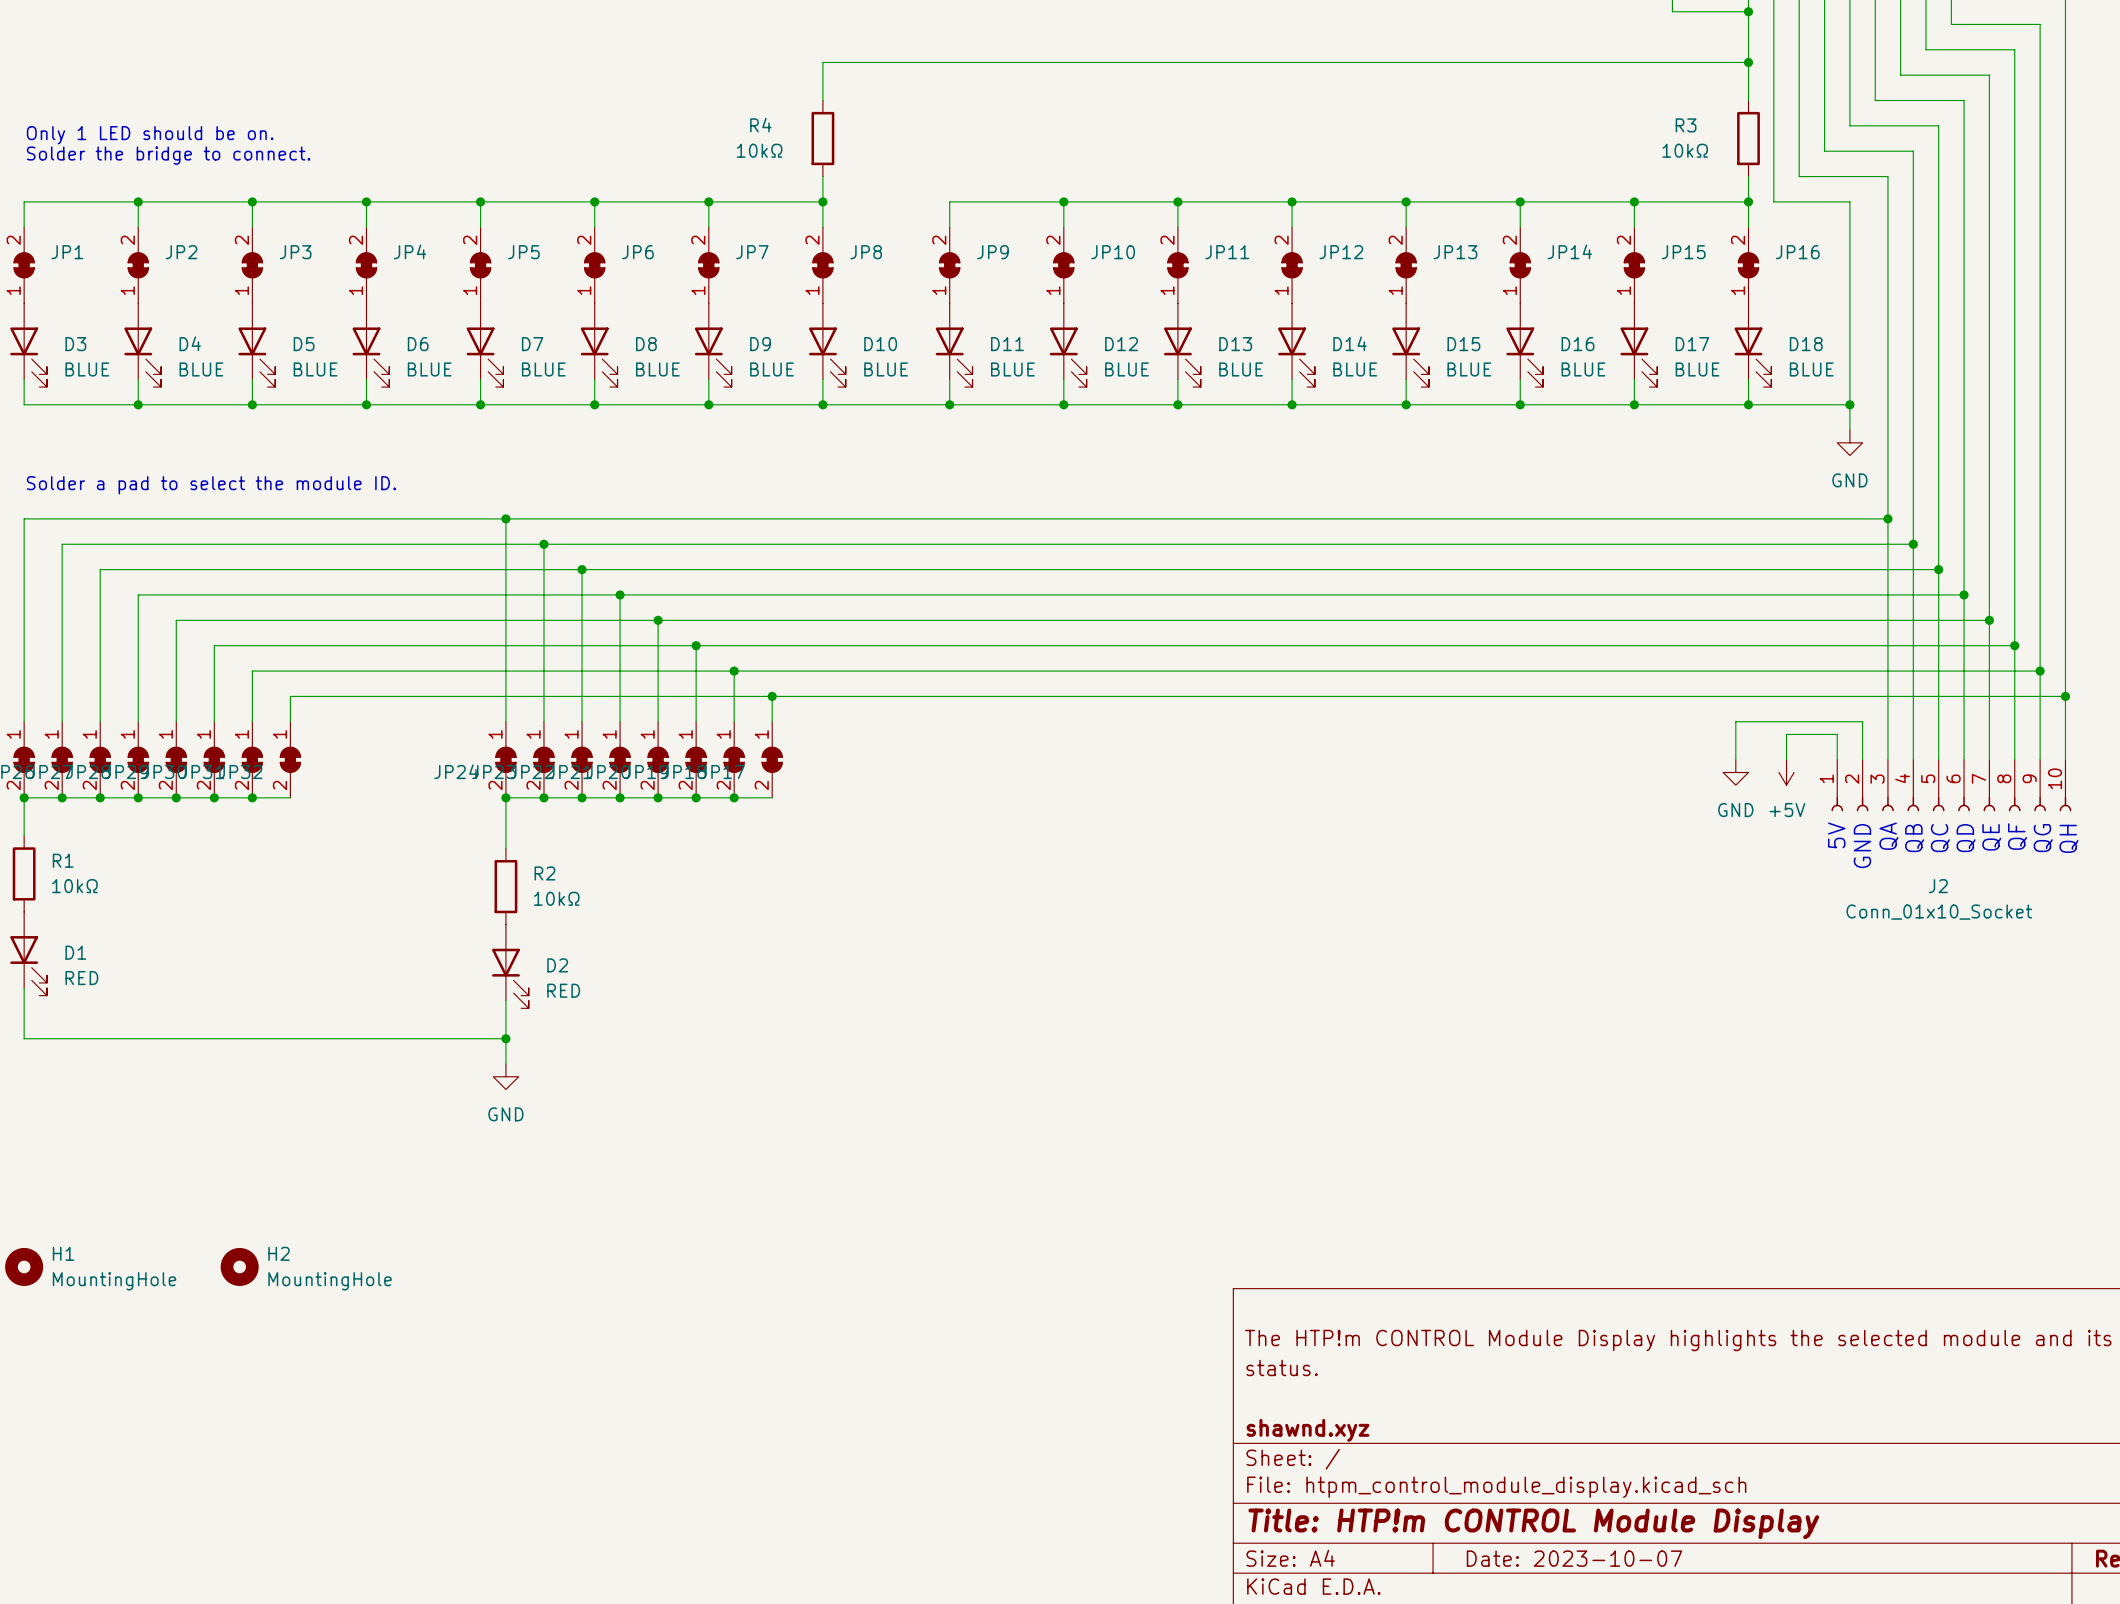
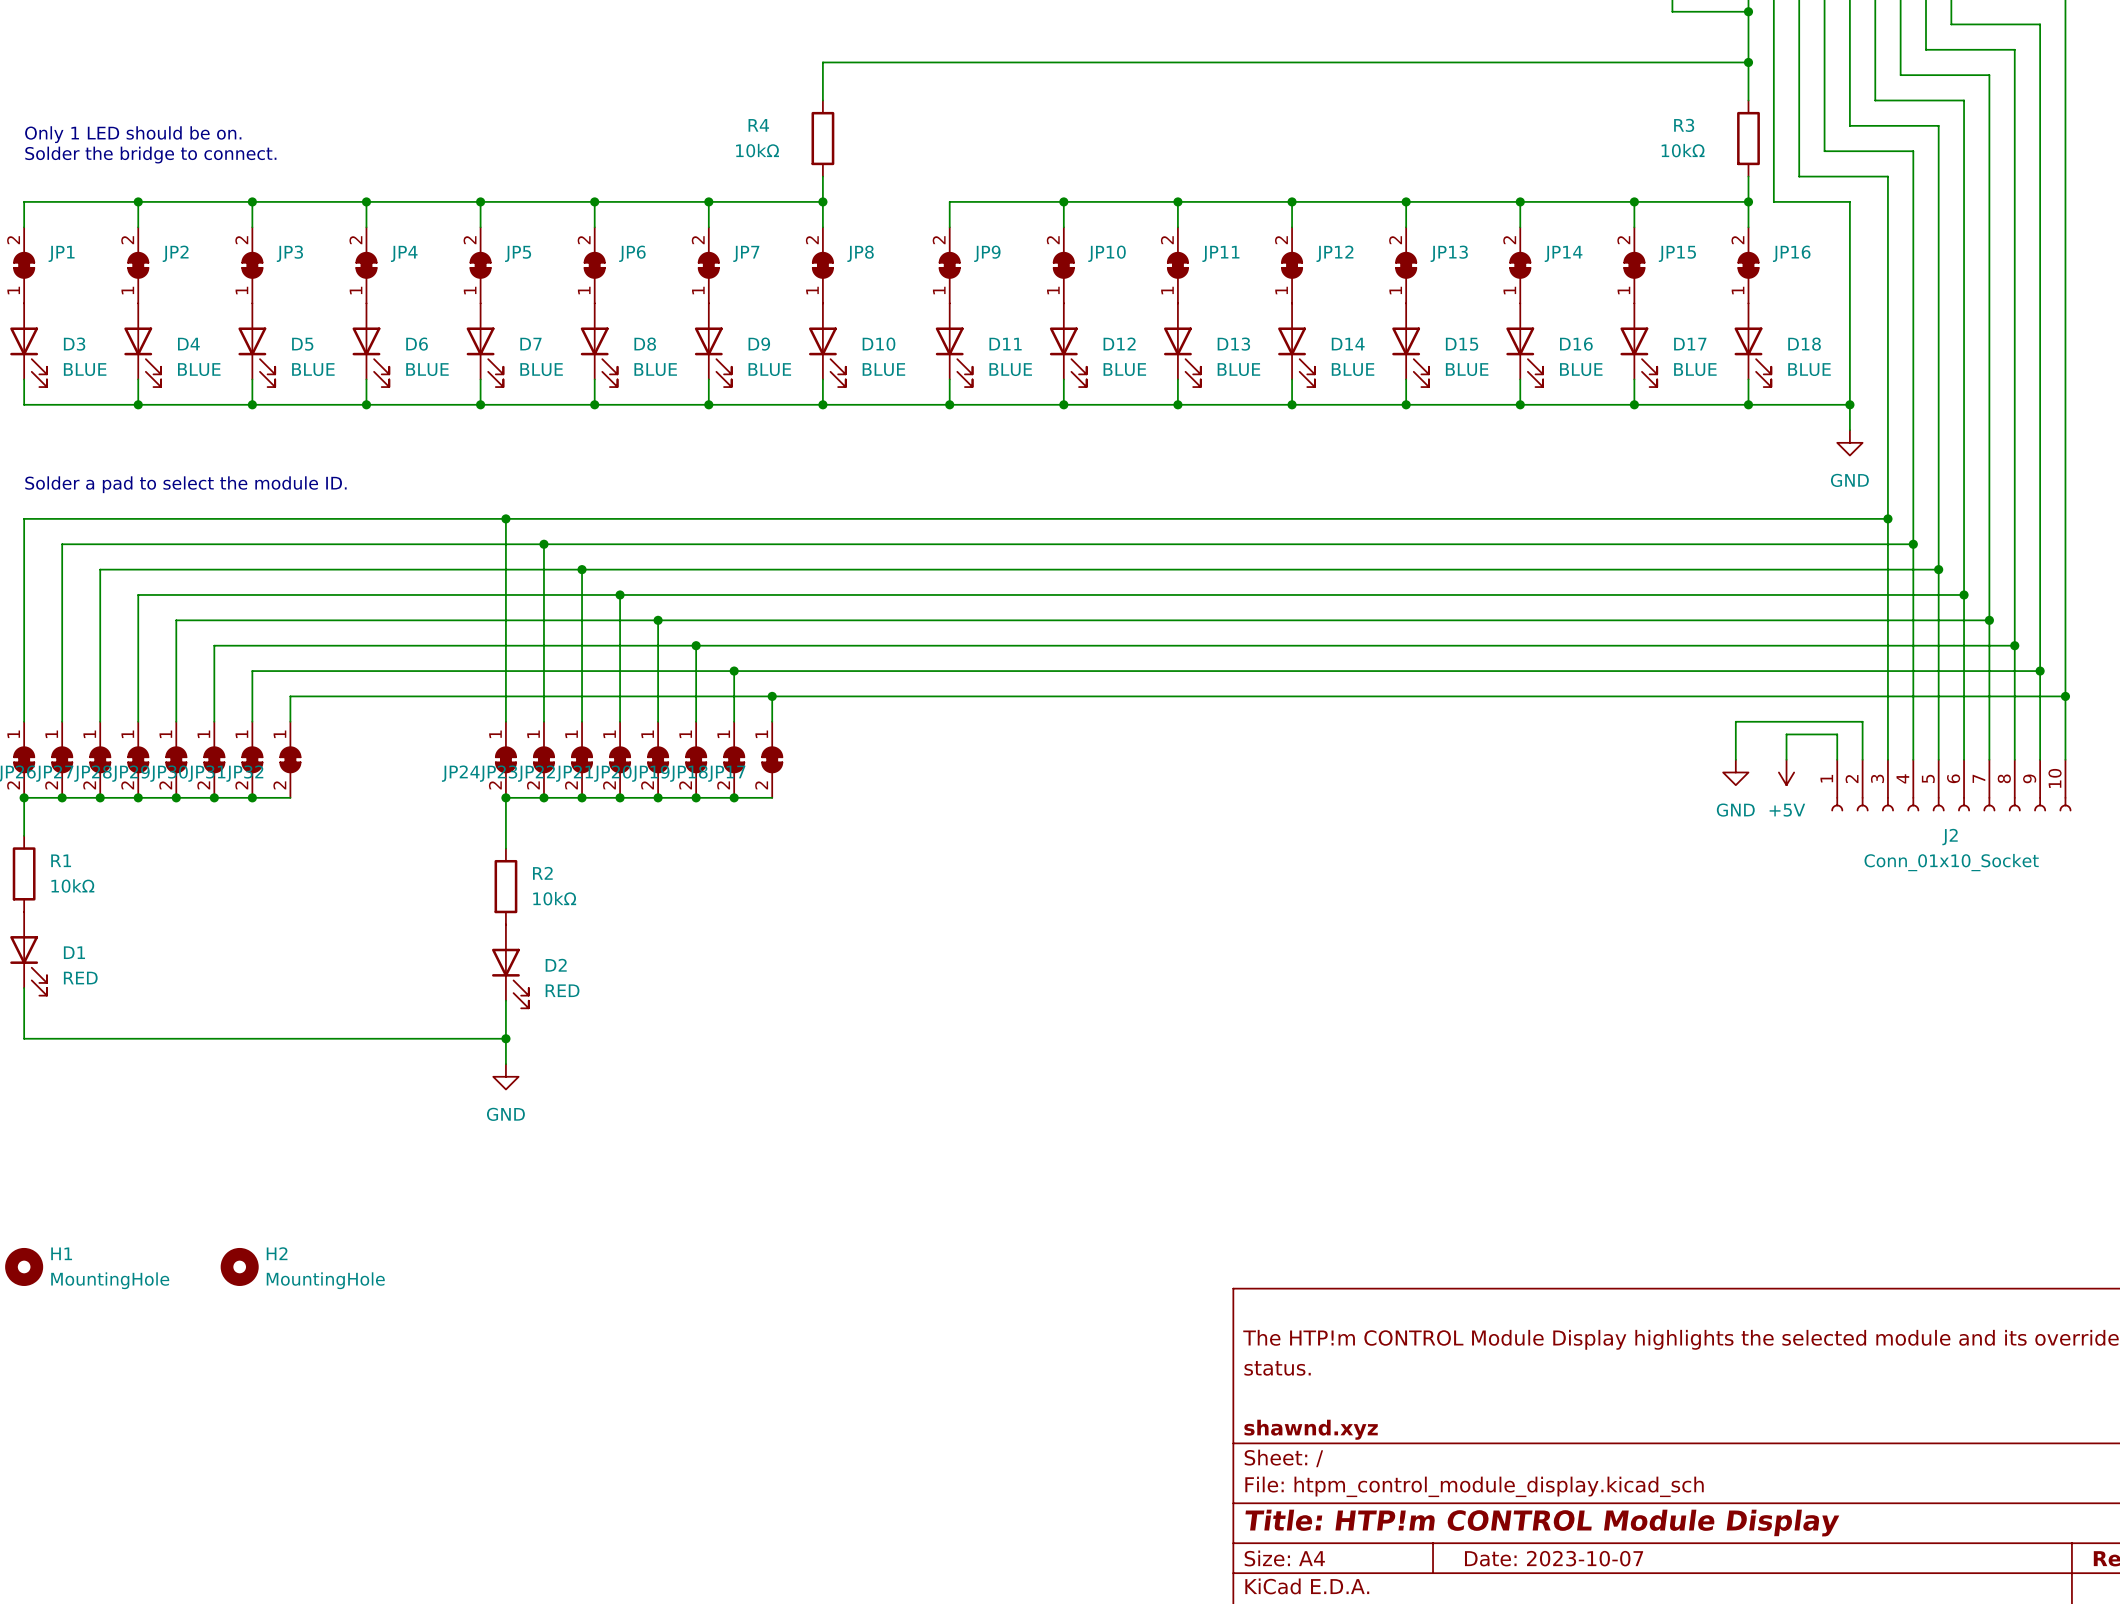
text: 5V (1836, 835) -> none
text: QA (1888, 836) -> none
text: QF (2017, 836) -> none
text: QE (1991, 837) -> none
text: QB (1914, 838) -> none
text: QC (1940, 838) -> none
text: QD (1966, 838) -> none
text: QG (2043, 838) -> none
text: QH (2068, 838) -> none
text: GND (1862, 846) -> none
J2 name position: J2 (1938, 886) -> J2 (1950, 837)
J2 value position: Conn_01x10_Socket (1939, 912) -> Conn_01x10_Socket (1951, 862)

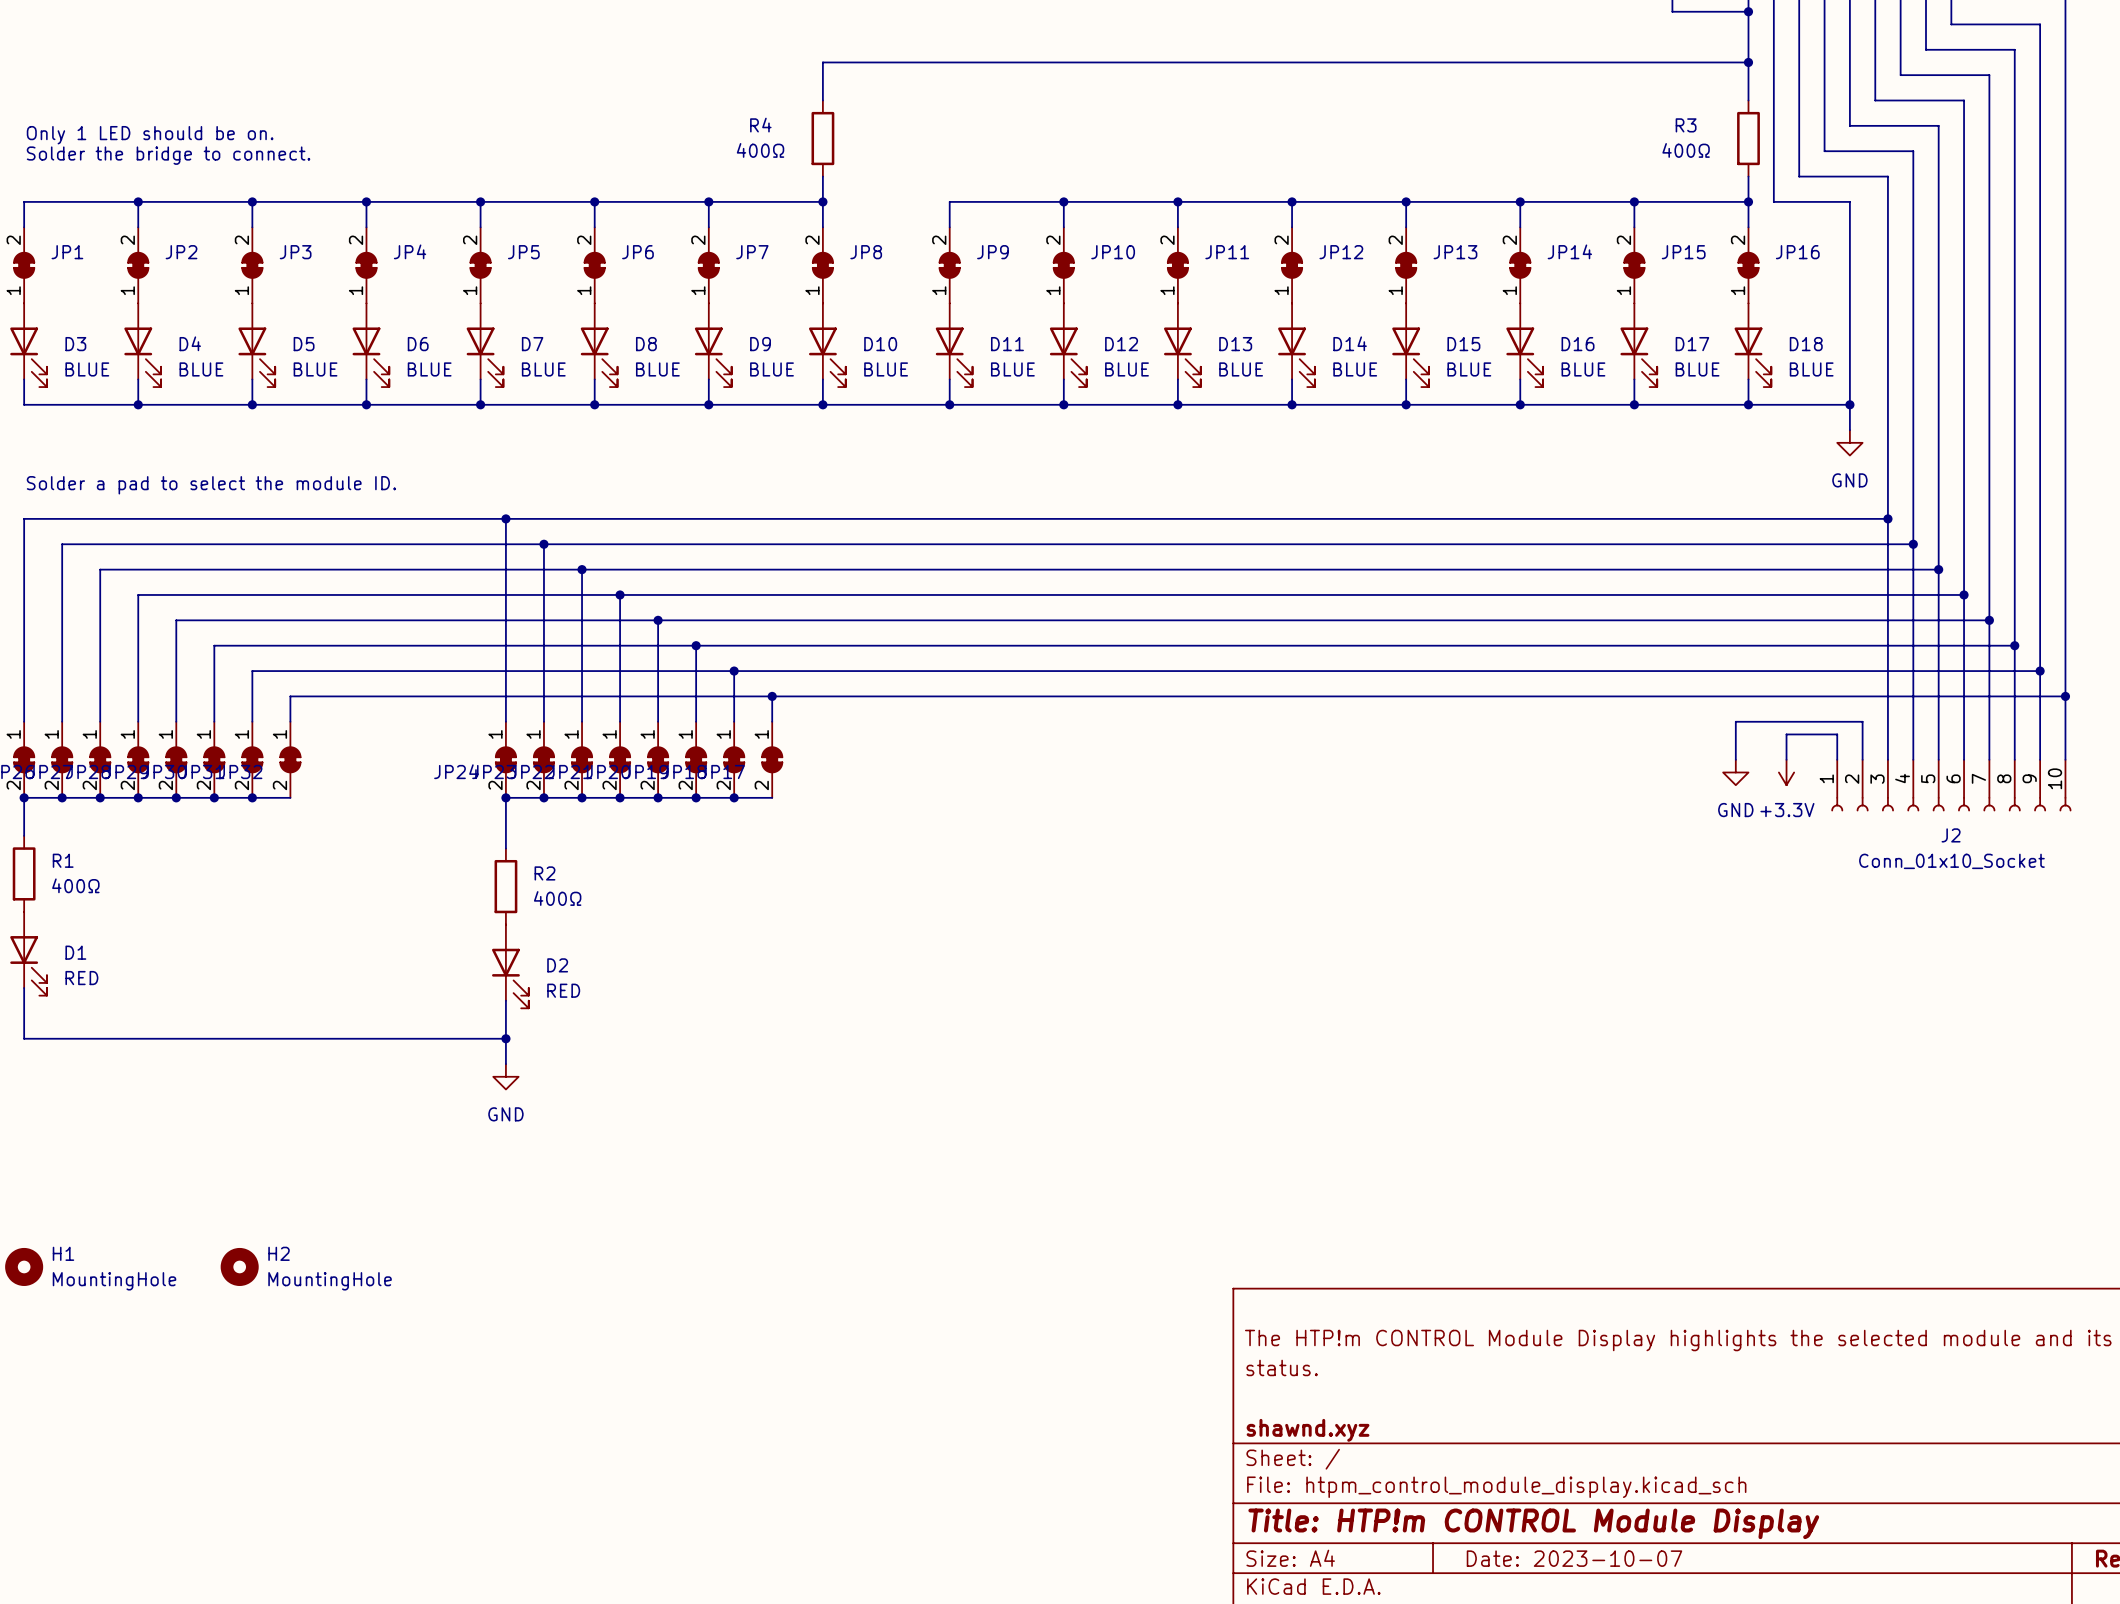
R4 value: 10kΩ (757, 150) -> 400Ω (760, 150)
R3 value: 10kΩ (1683, 150) -> 400Ω (1686, 150)
power symbol: +5V (1786, 772) -> +3.3V (1786, 772)
R1 value: 10kΩ (72, 885) -> 400Ω (75, 885)
R2 value: 10kΩ (554, 898) -> 400Ω (557, 898)

